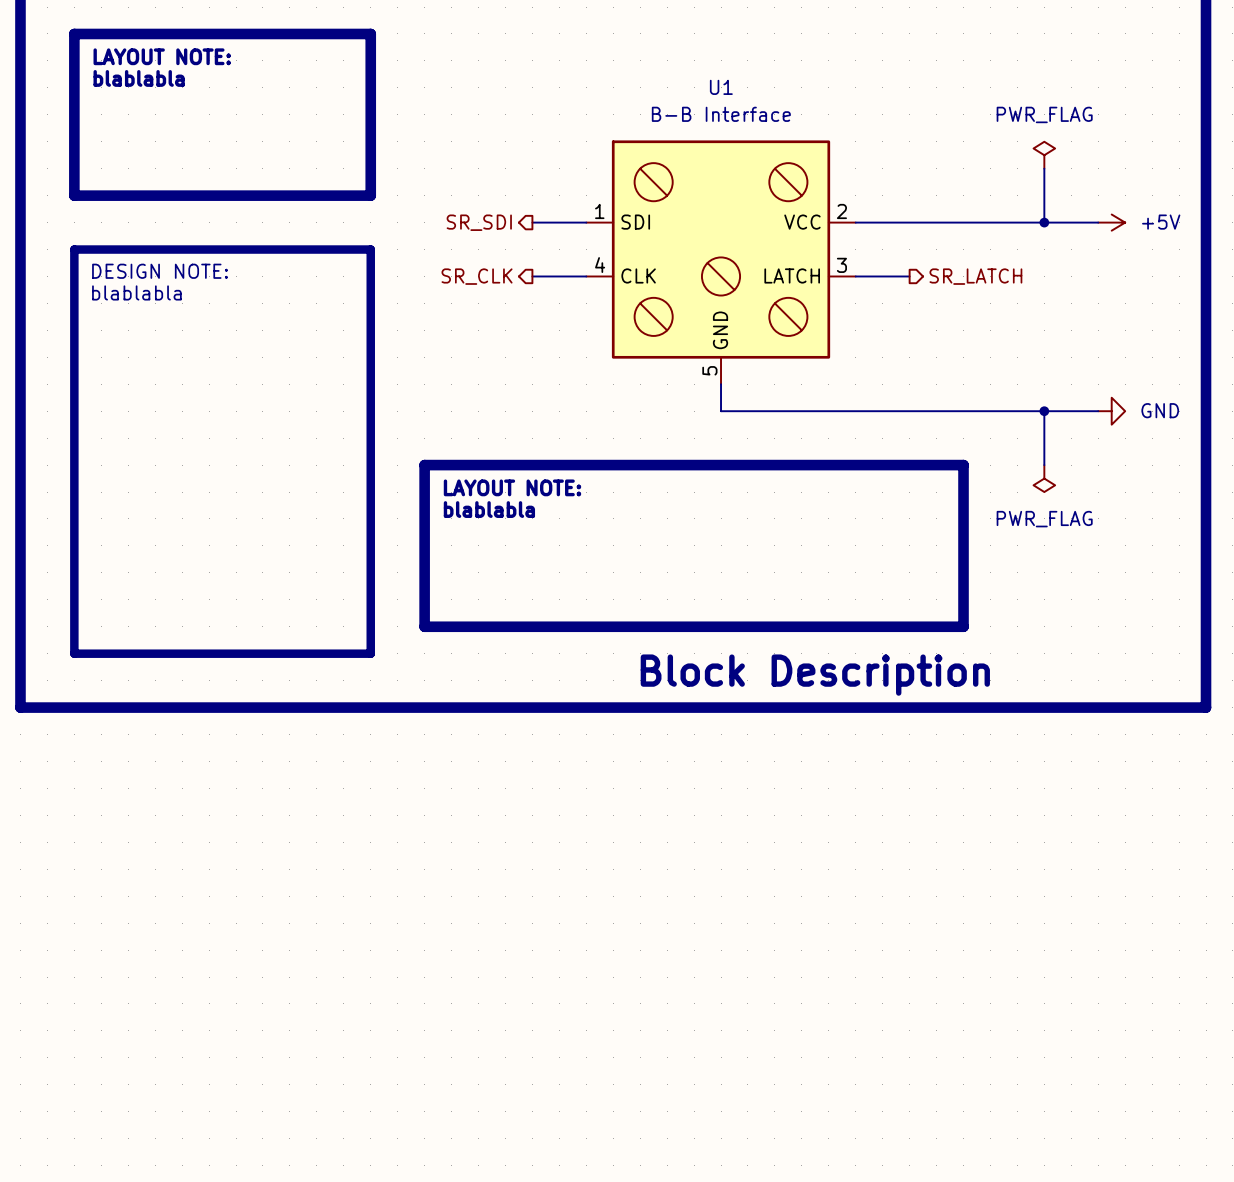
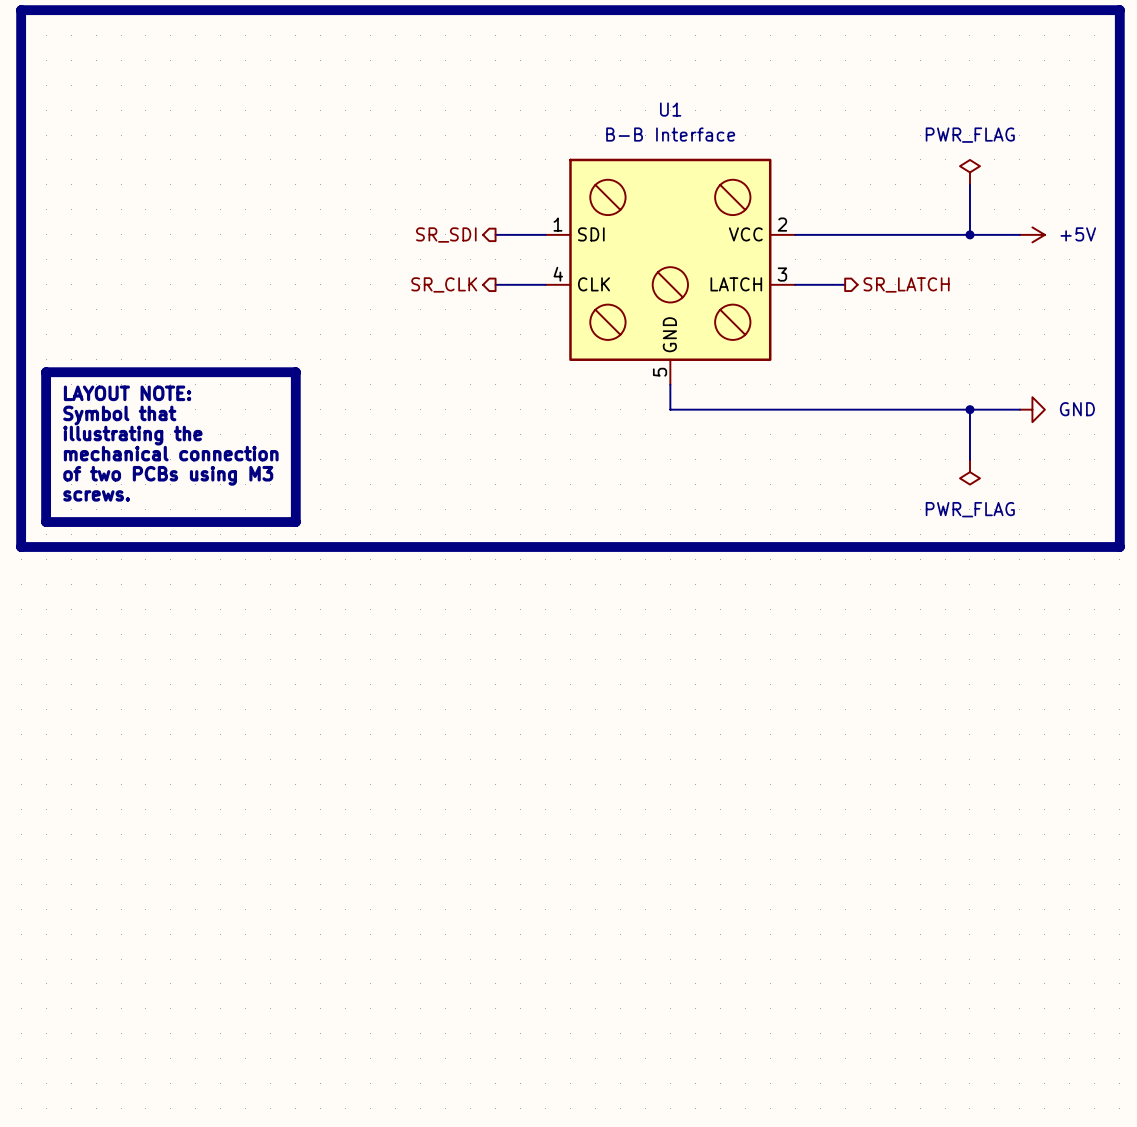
line: (74, 33) (370, 33) (370, 195) (74, 195) (74, 33) -> none
text: LAYOUT NOTE: (162, 56) -> none
text: blablabla (139, 78) -> none
line: (74, 249) (370, 249) (370, 653) (74, 653) (74, 249) -> none
text: DESIGN NOTE: (160, 271) -> none
text: blablabla (136, 292) -> none
line: none -> (46, 372) (295, 372) (295, 522) (46, 522) (46, 372)
text: none -> LAYOUT NOTE: (127, 393)
text: none -> Symbol that (119, 415)
text: none -> illustrating the (132, 435)
text: none -> mechanical connection (171, 453)
line: (424, 465) (963, 465) (963, 626) (424, 626) (424, 465) -> none
text: none -> of two PCBs using M3 (168, 475)
text: LAYOUT NOTE: (512, 487) -> none
text: none -> screws. (96, 495)
text: blablabla (489, 509) -> none
line: (20, 559) (20, 707) (1206, 707) (1206, 559) -> (21, 547) (1119, 547)
text: Block Description (815, 675) -> none

